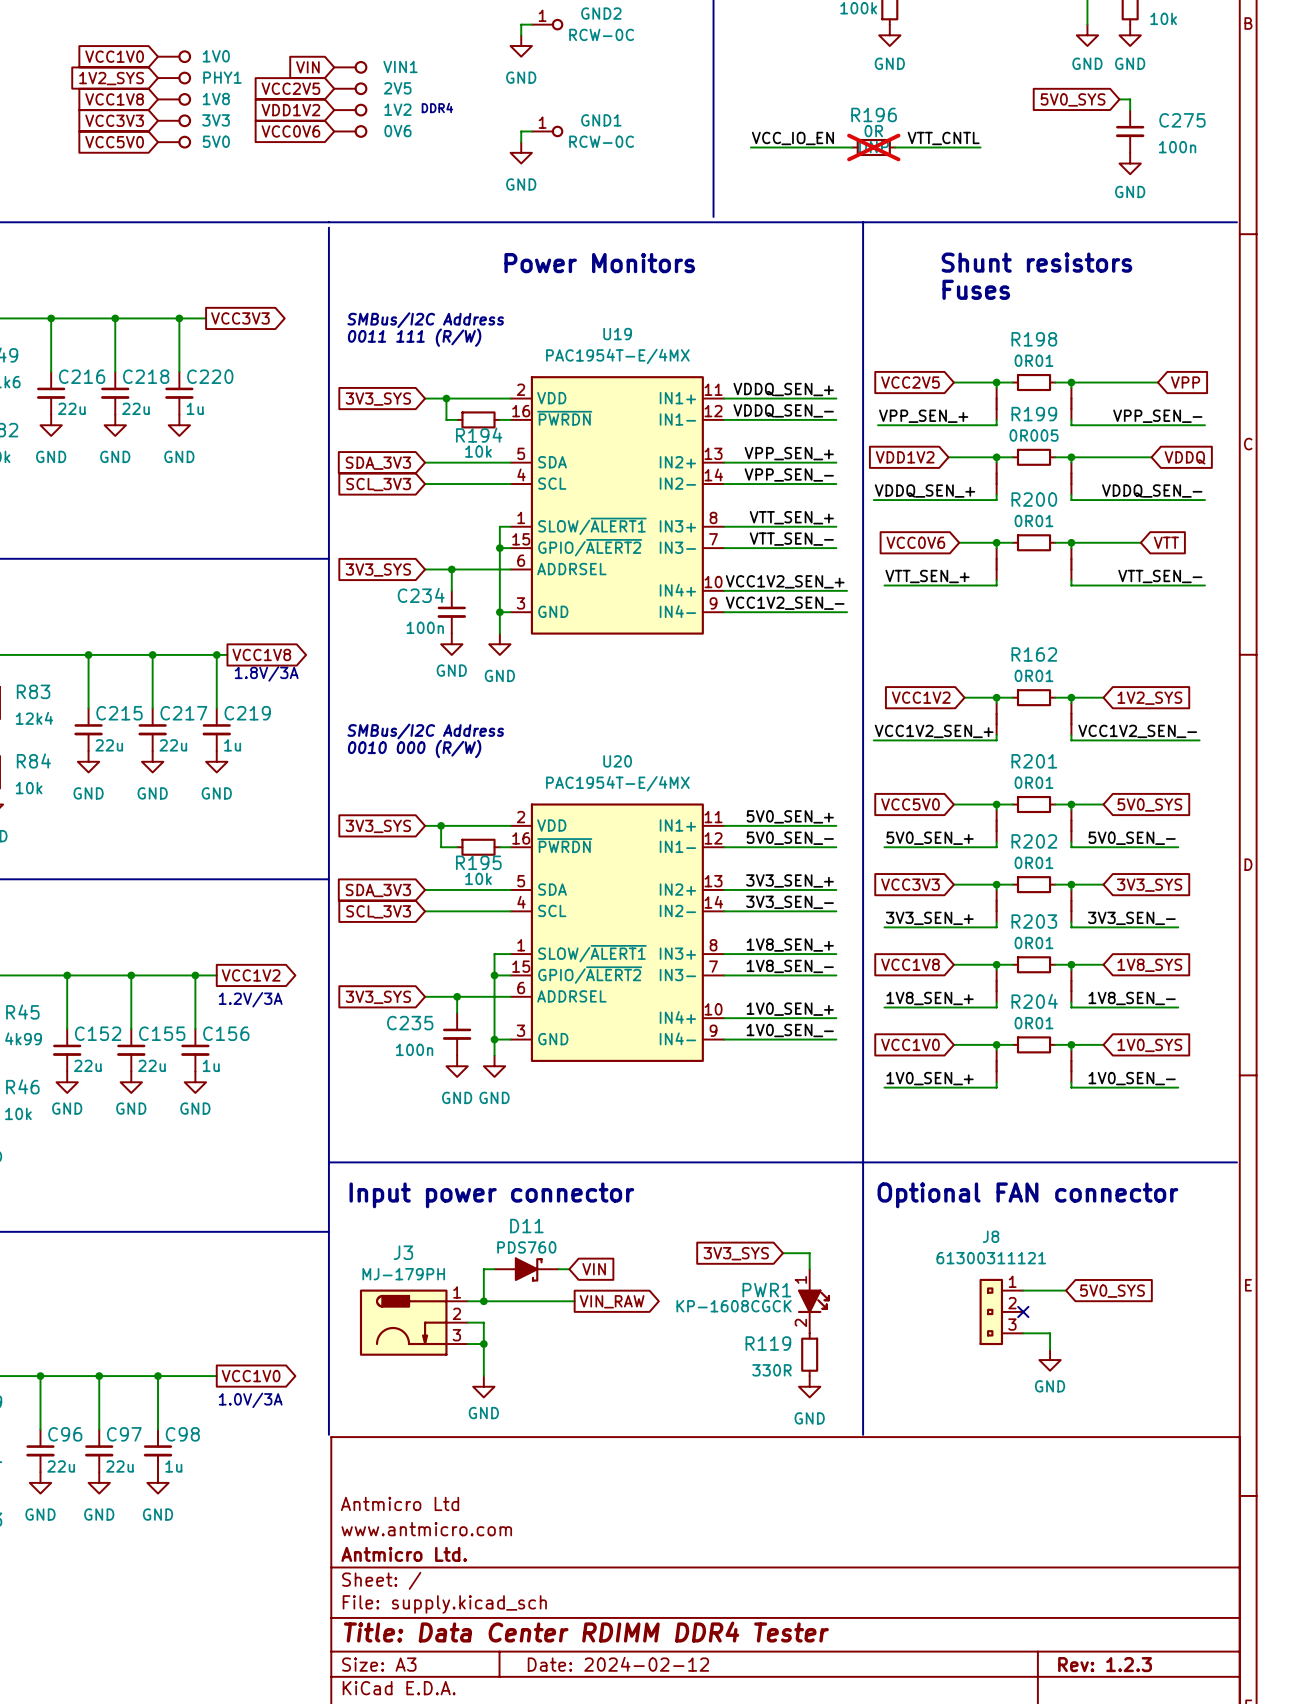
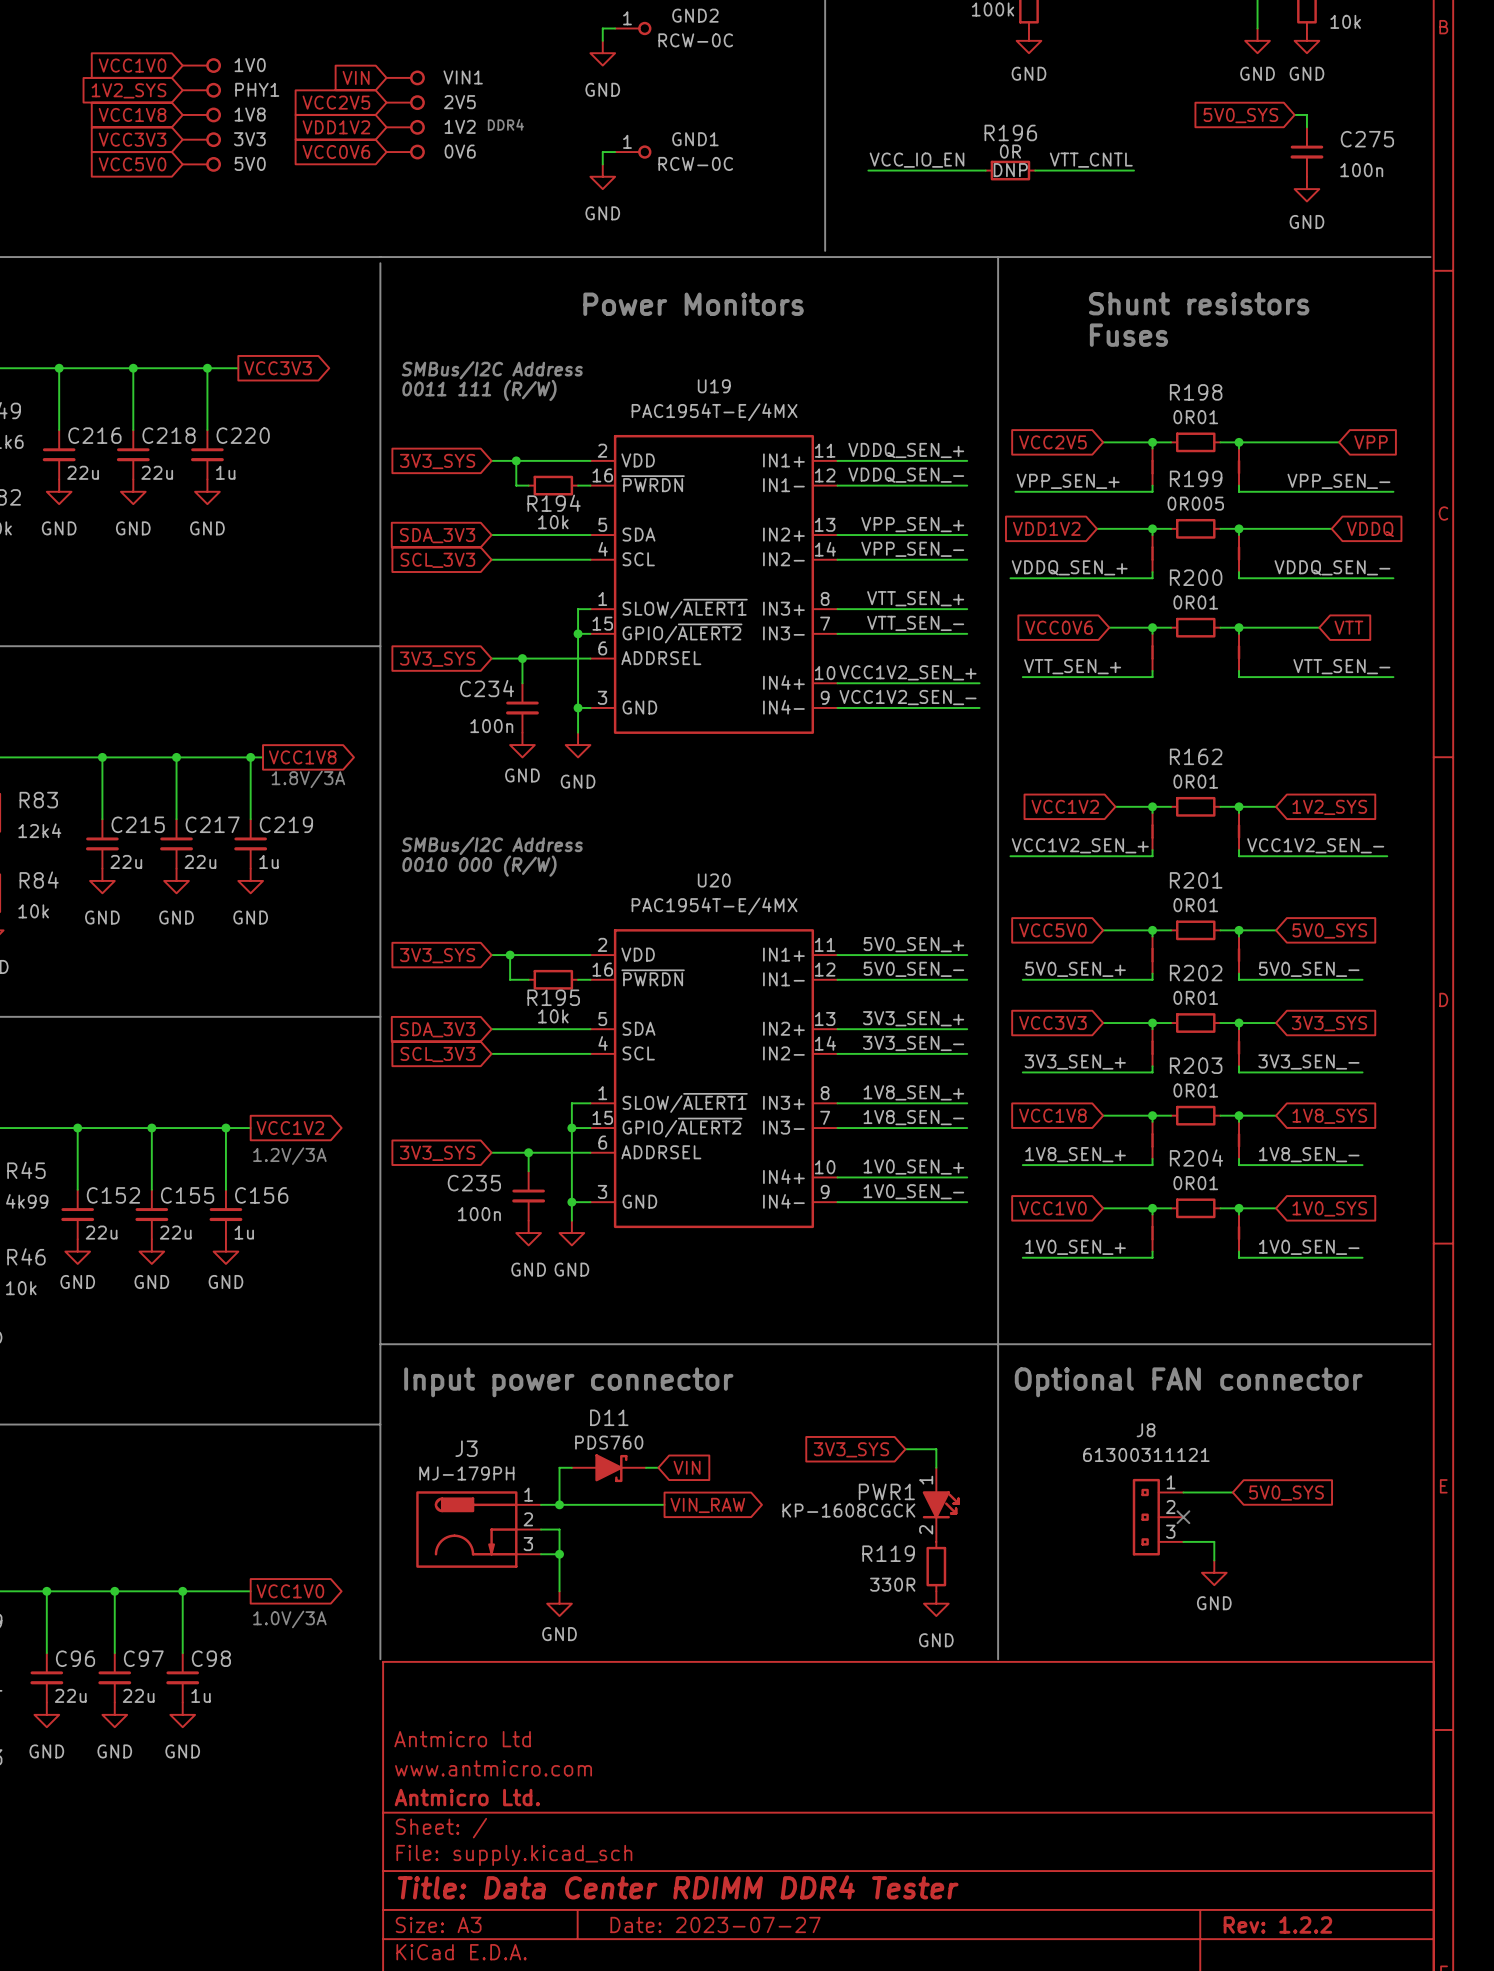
R196 do-not-place cross: (873, 147) -> none
title block: Date: 2024-02-12 (618, 1664) -> Date: 2023-07-27 (715, 1924)
title block: Rev: 1.2.3 (1105, 1664) -> Rev: 1.2.2 (1277, 1924)

